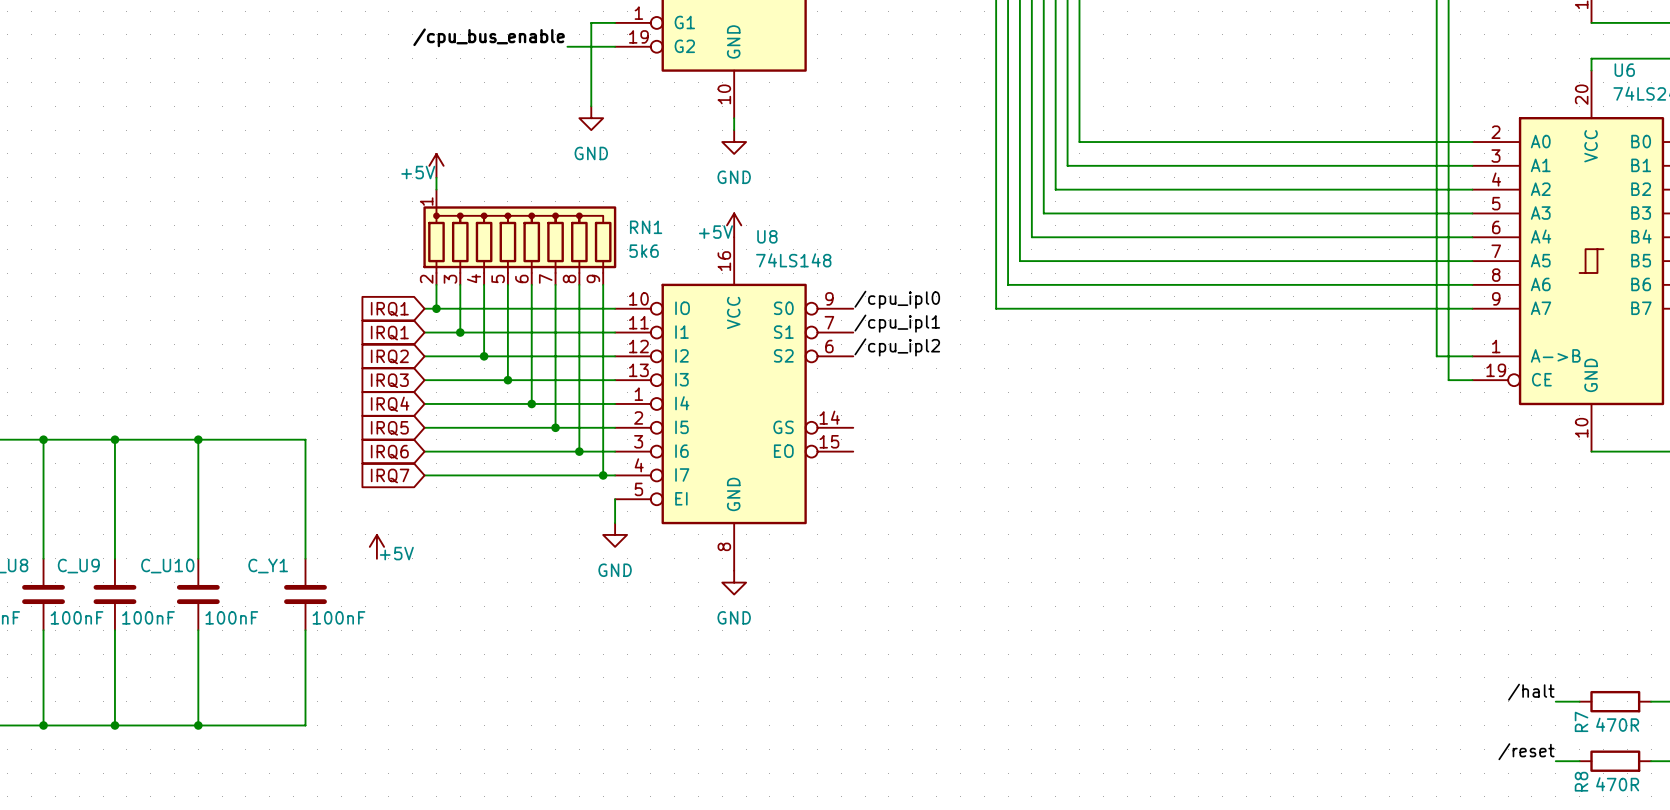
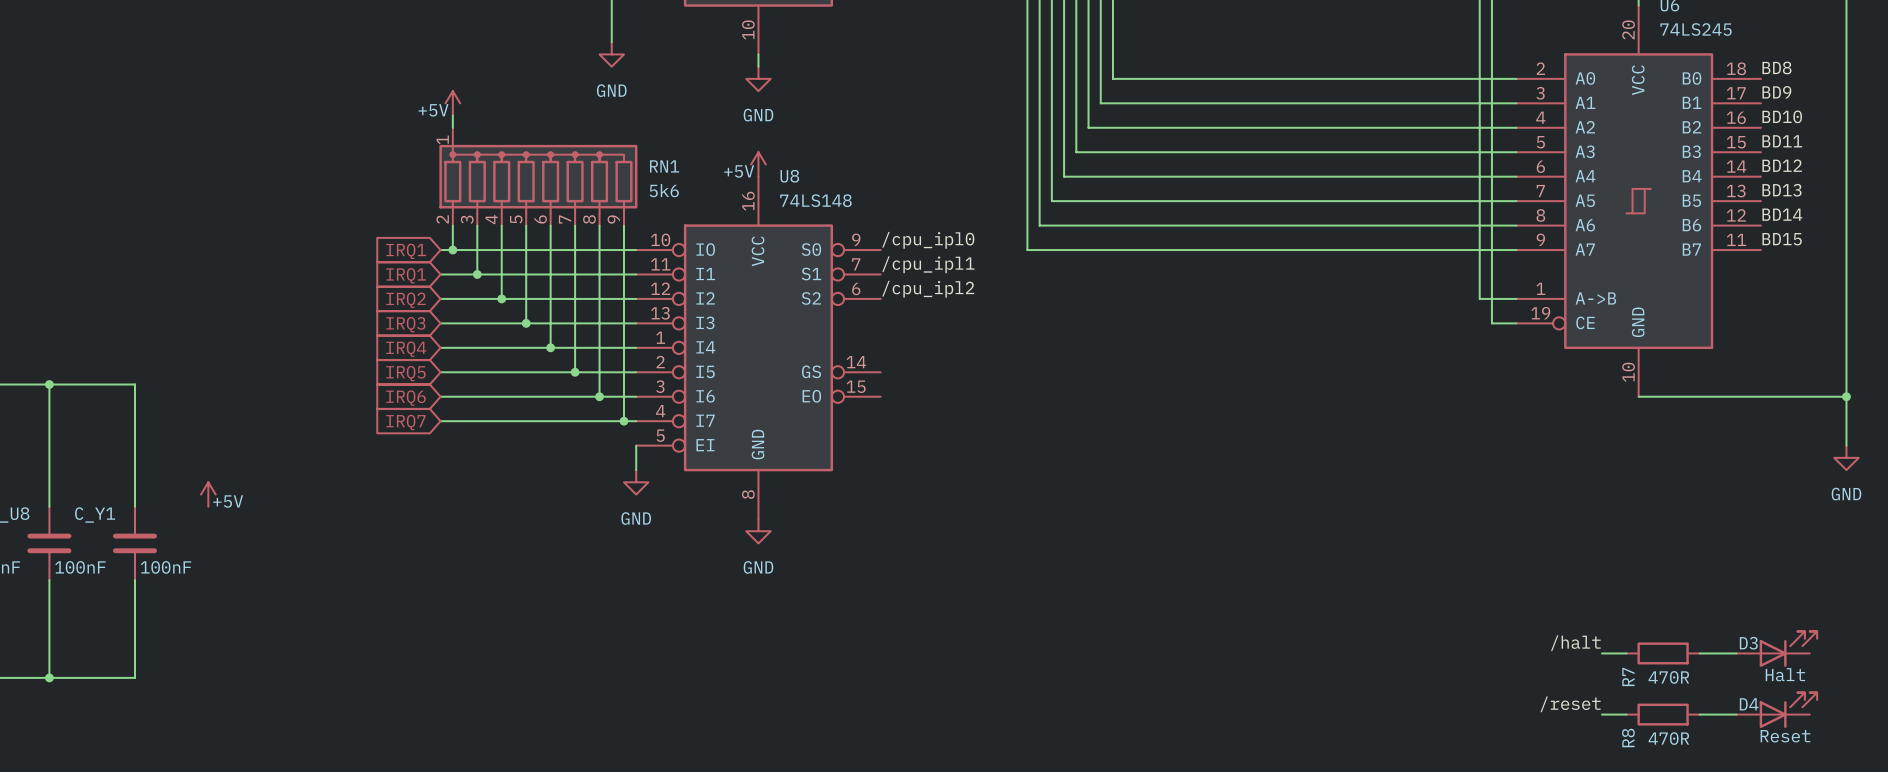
wire: (114, 439) (114, 558) -> none
junction: (114, 439) -> none
wire: (126, 439) (305, 439) (305, 558) -> (134, 384) (134, 506)
wire: (198, 439) (198, 558) -> none
junction: (198, 439) -> none
power symbol position: +5V (376, 546) -> +5V (208, 494)
C_U9: 100nF (114, 594) -> none
C_U10: 100nF (198, 594) -> none
C_Y1 position: (305, 594) -> (134, 543)
wire: (114, 630) (114, 725) -> none
wire: (198, 630) (198, 725) -> none
wire: (305, 630) (305, 725) (126, 725) -> (134, 580) (134, 677)
junction: (114, 725) -> none
junction: (198, 725) -> none

